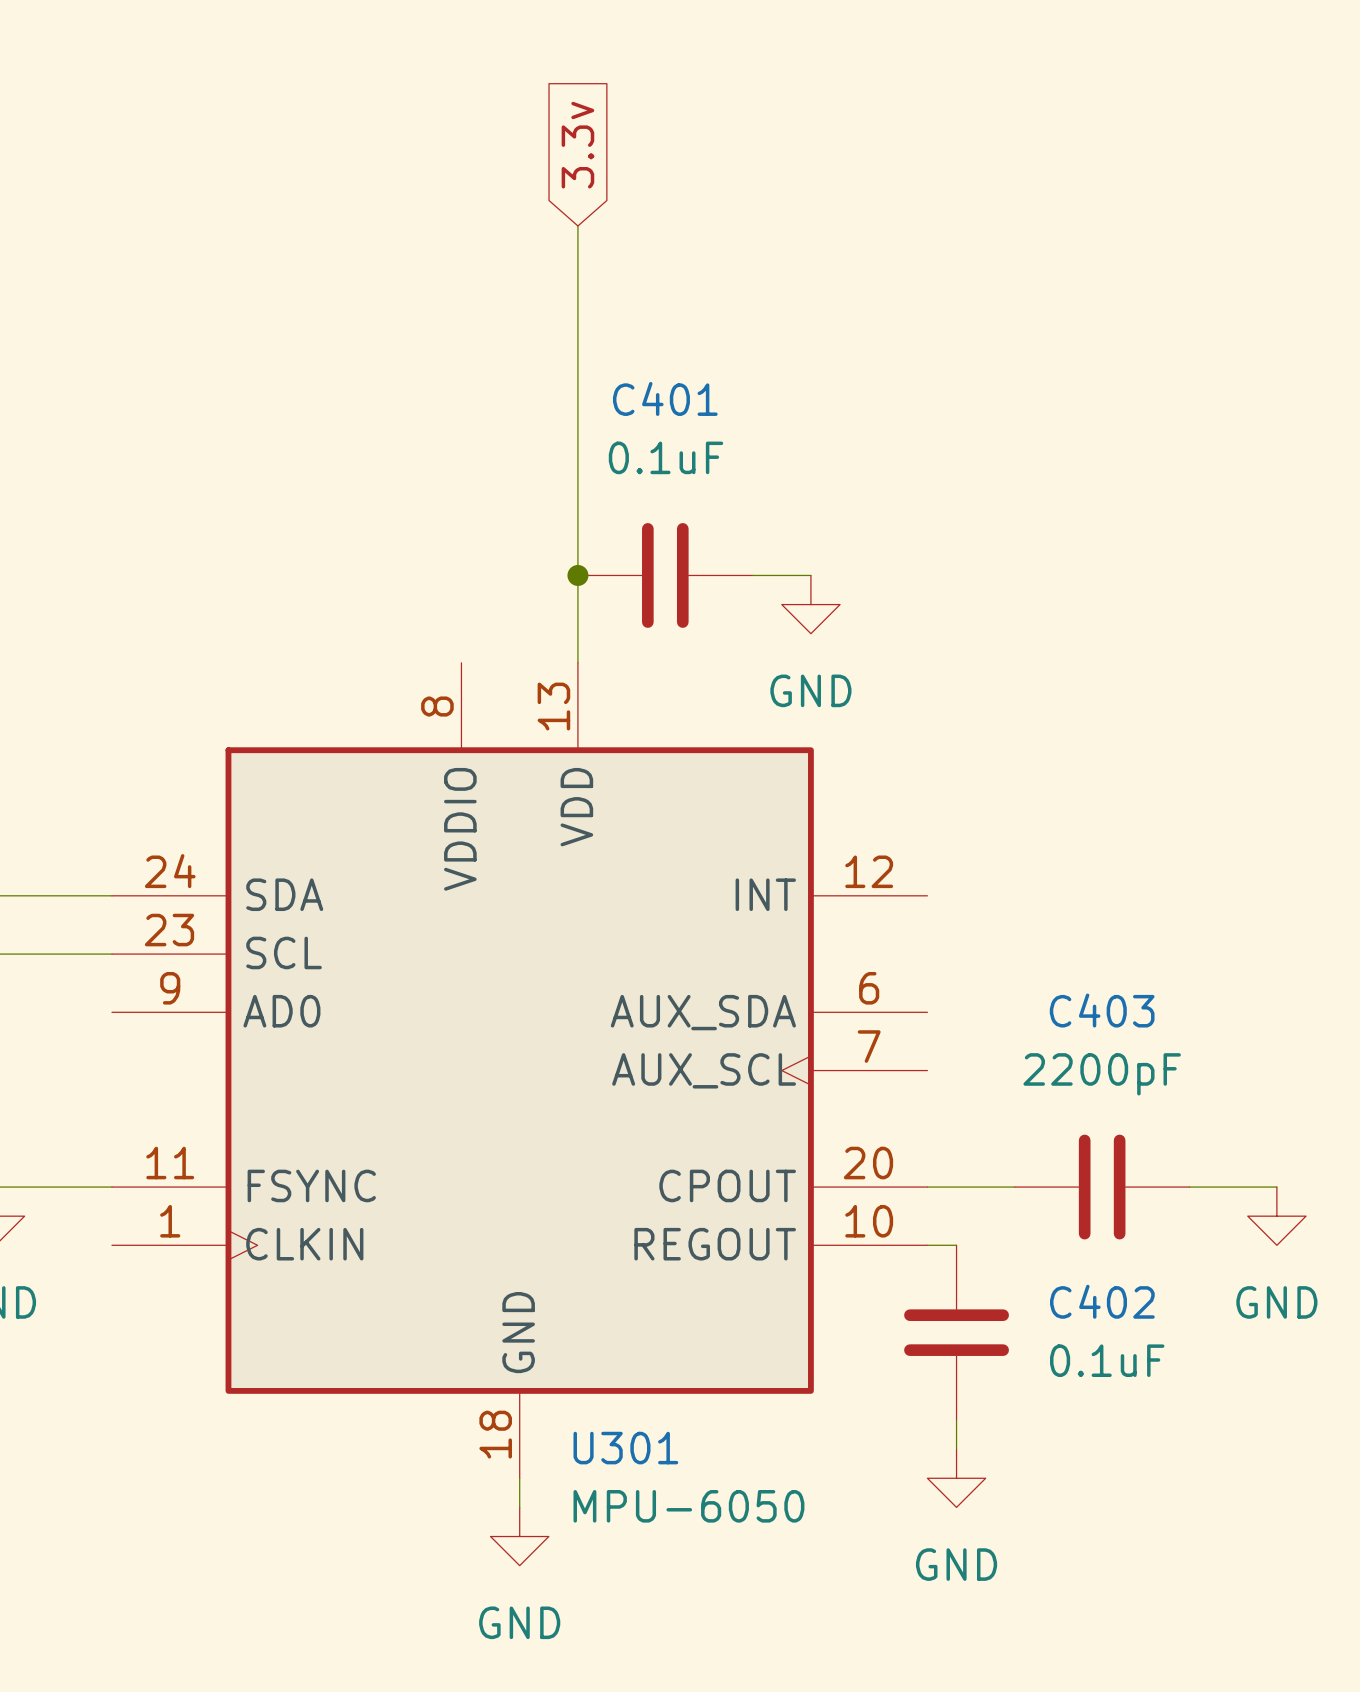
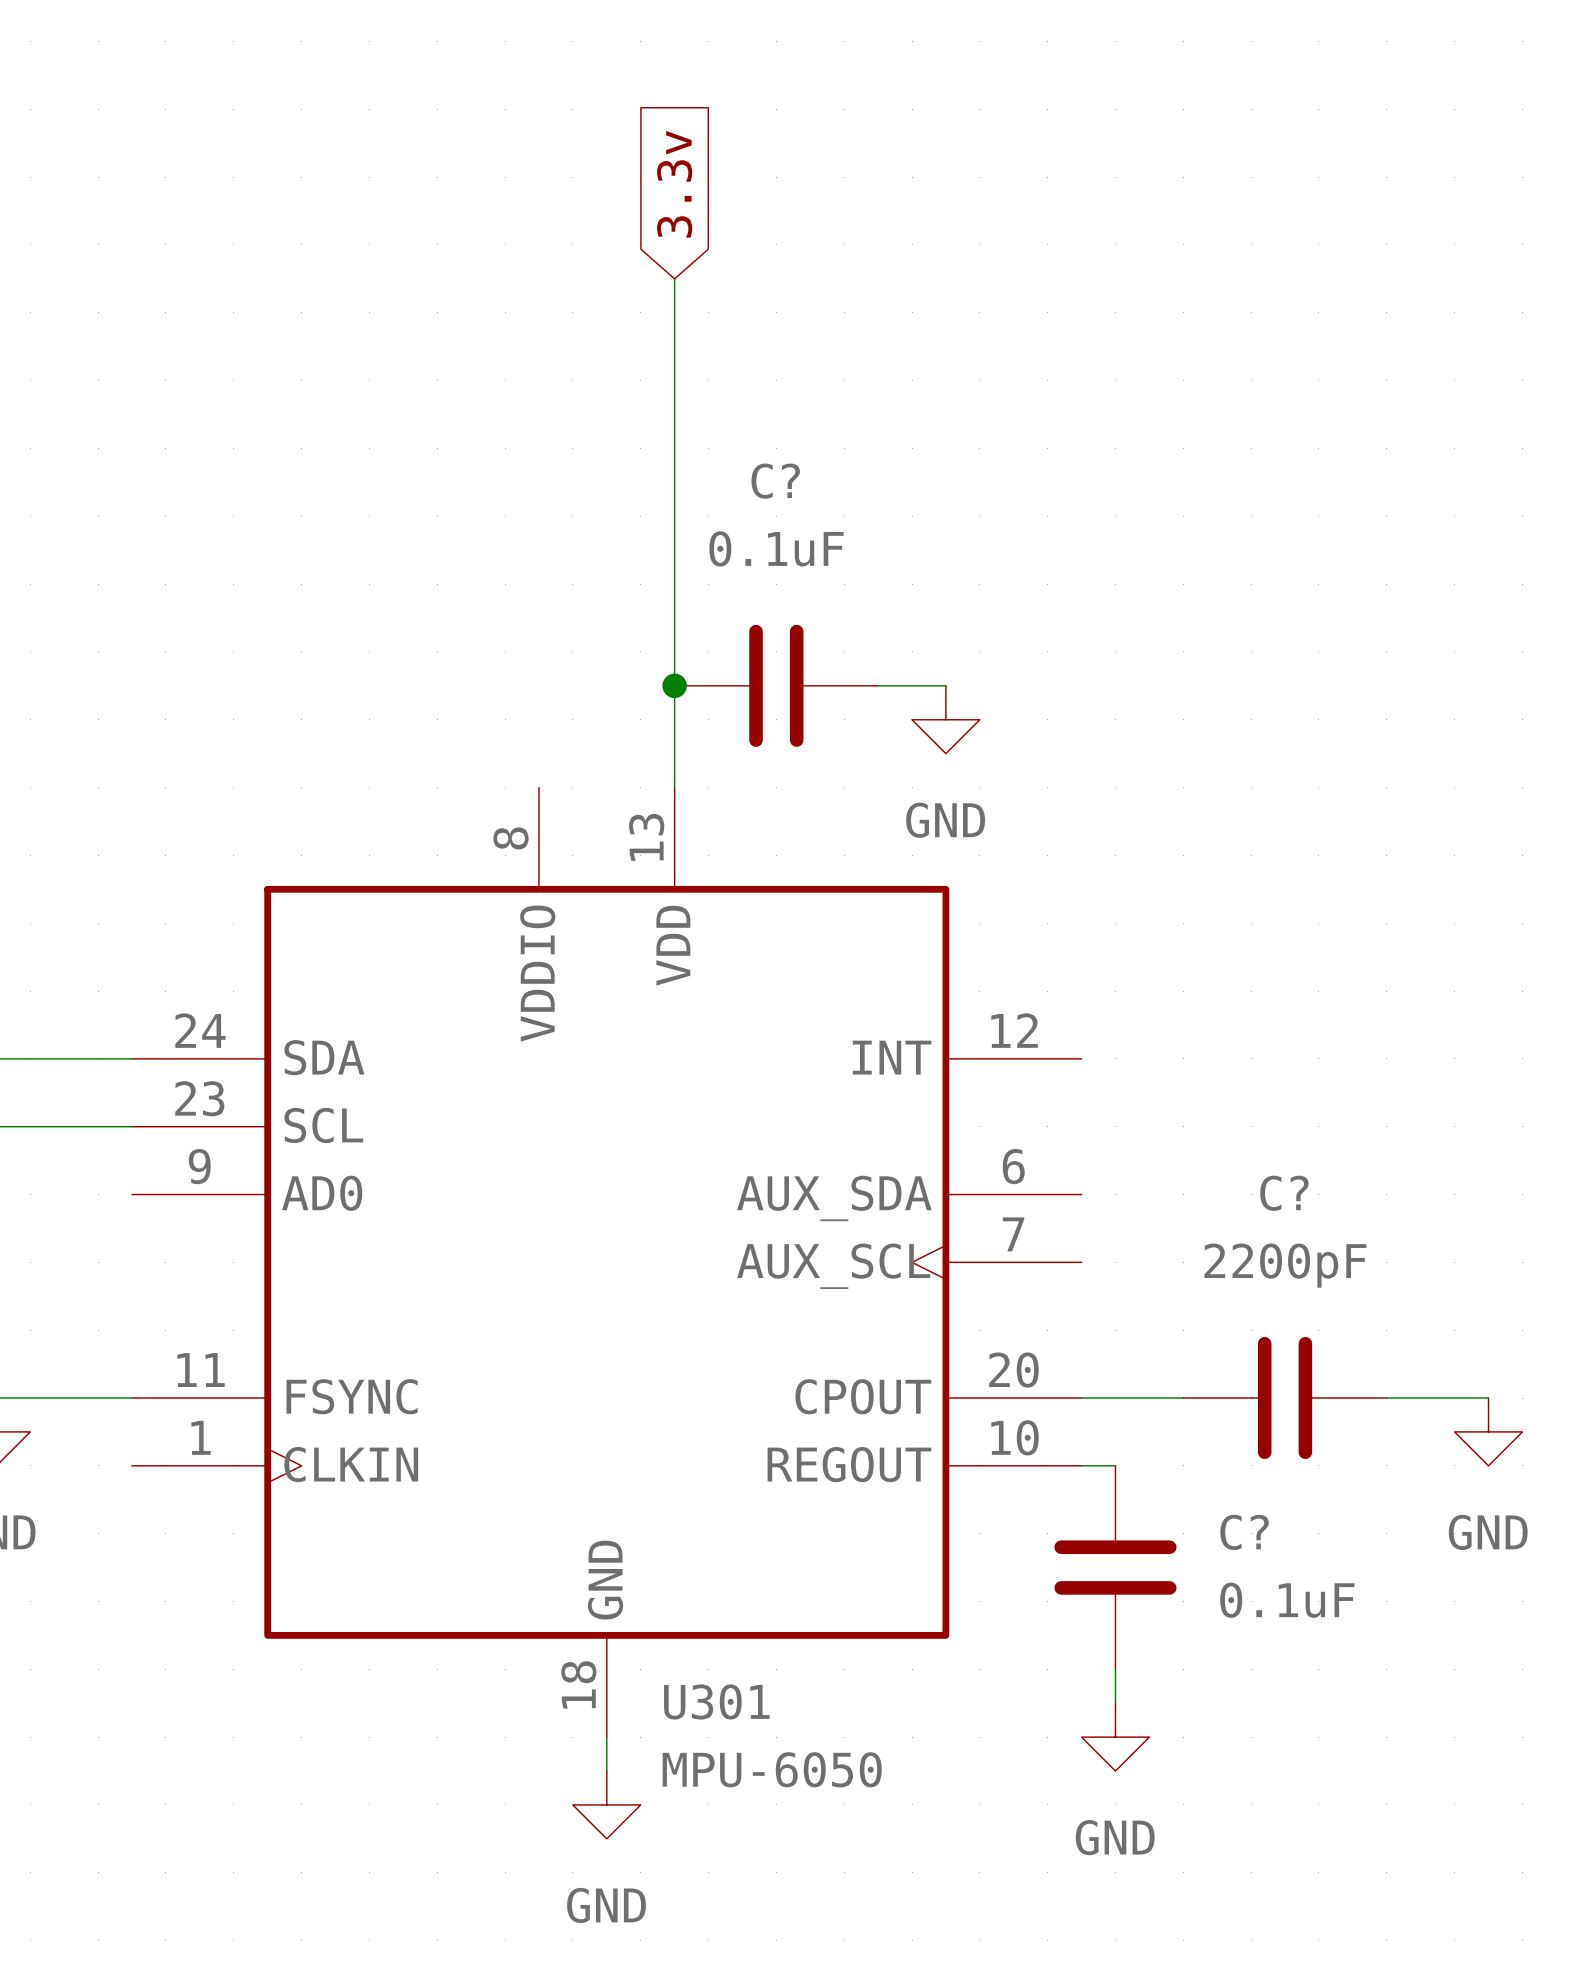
C401 name: C401 (665, 398) -> C? (775, 481)
C403 name: C403 (1102, 1010) -> C? (1284, 1193)
C402 name: C402 (1102, 1301) -> C? (1244, 1532)

